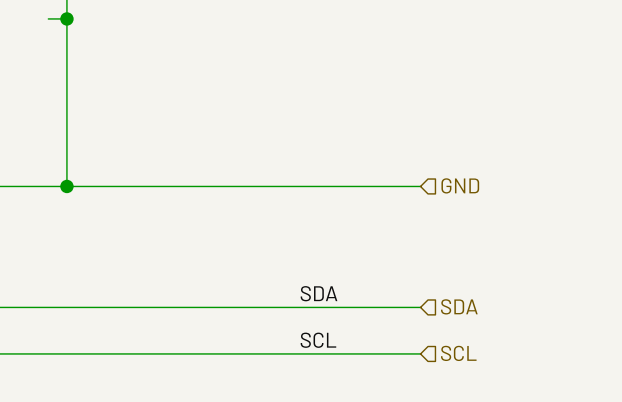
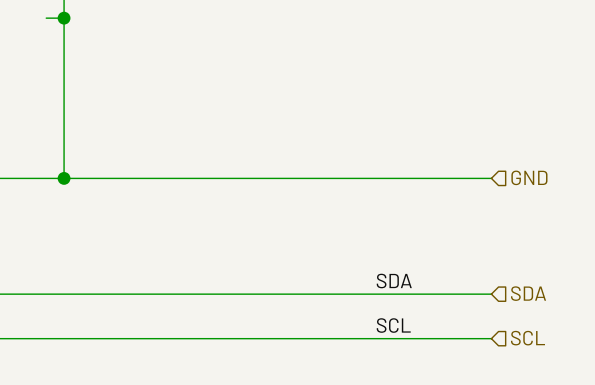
hierarchical label position: GND (460, 185) -> GND (529, 177)
wire: none -> (402, 178) (491, 178)
label position: SDA (319, 293) -> SDA (394, 281)
hierarchical label position: SDA (459, 306) -> SDA (528, 293)
wire: none -> (402, 294) (491, 294)
label position: SCL (318, 340) -> SCL (393, 325)
wire: none -> (402, 338) (491, 338)
hierarchical label position: SCL (458, 353) -> SCL (527, 338)

